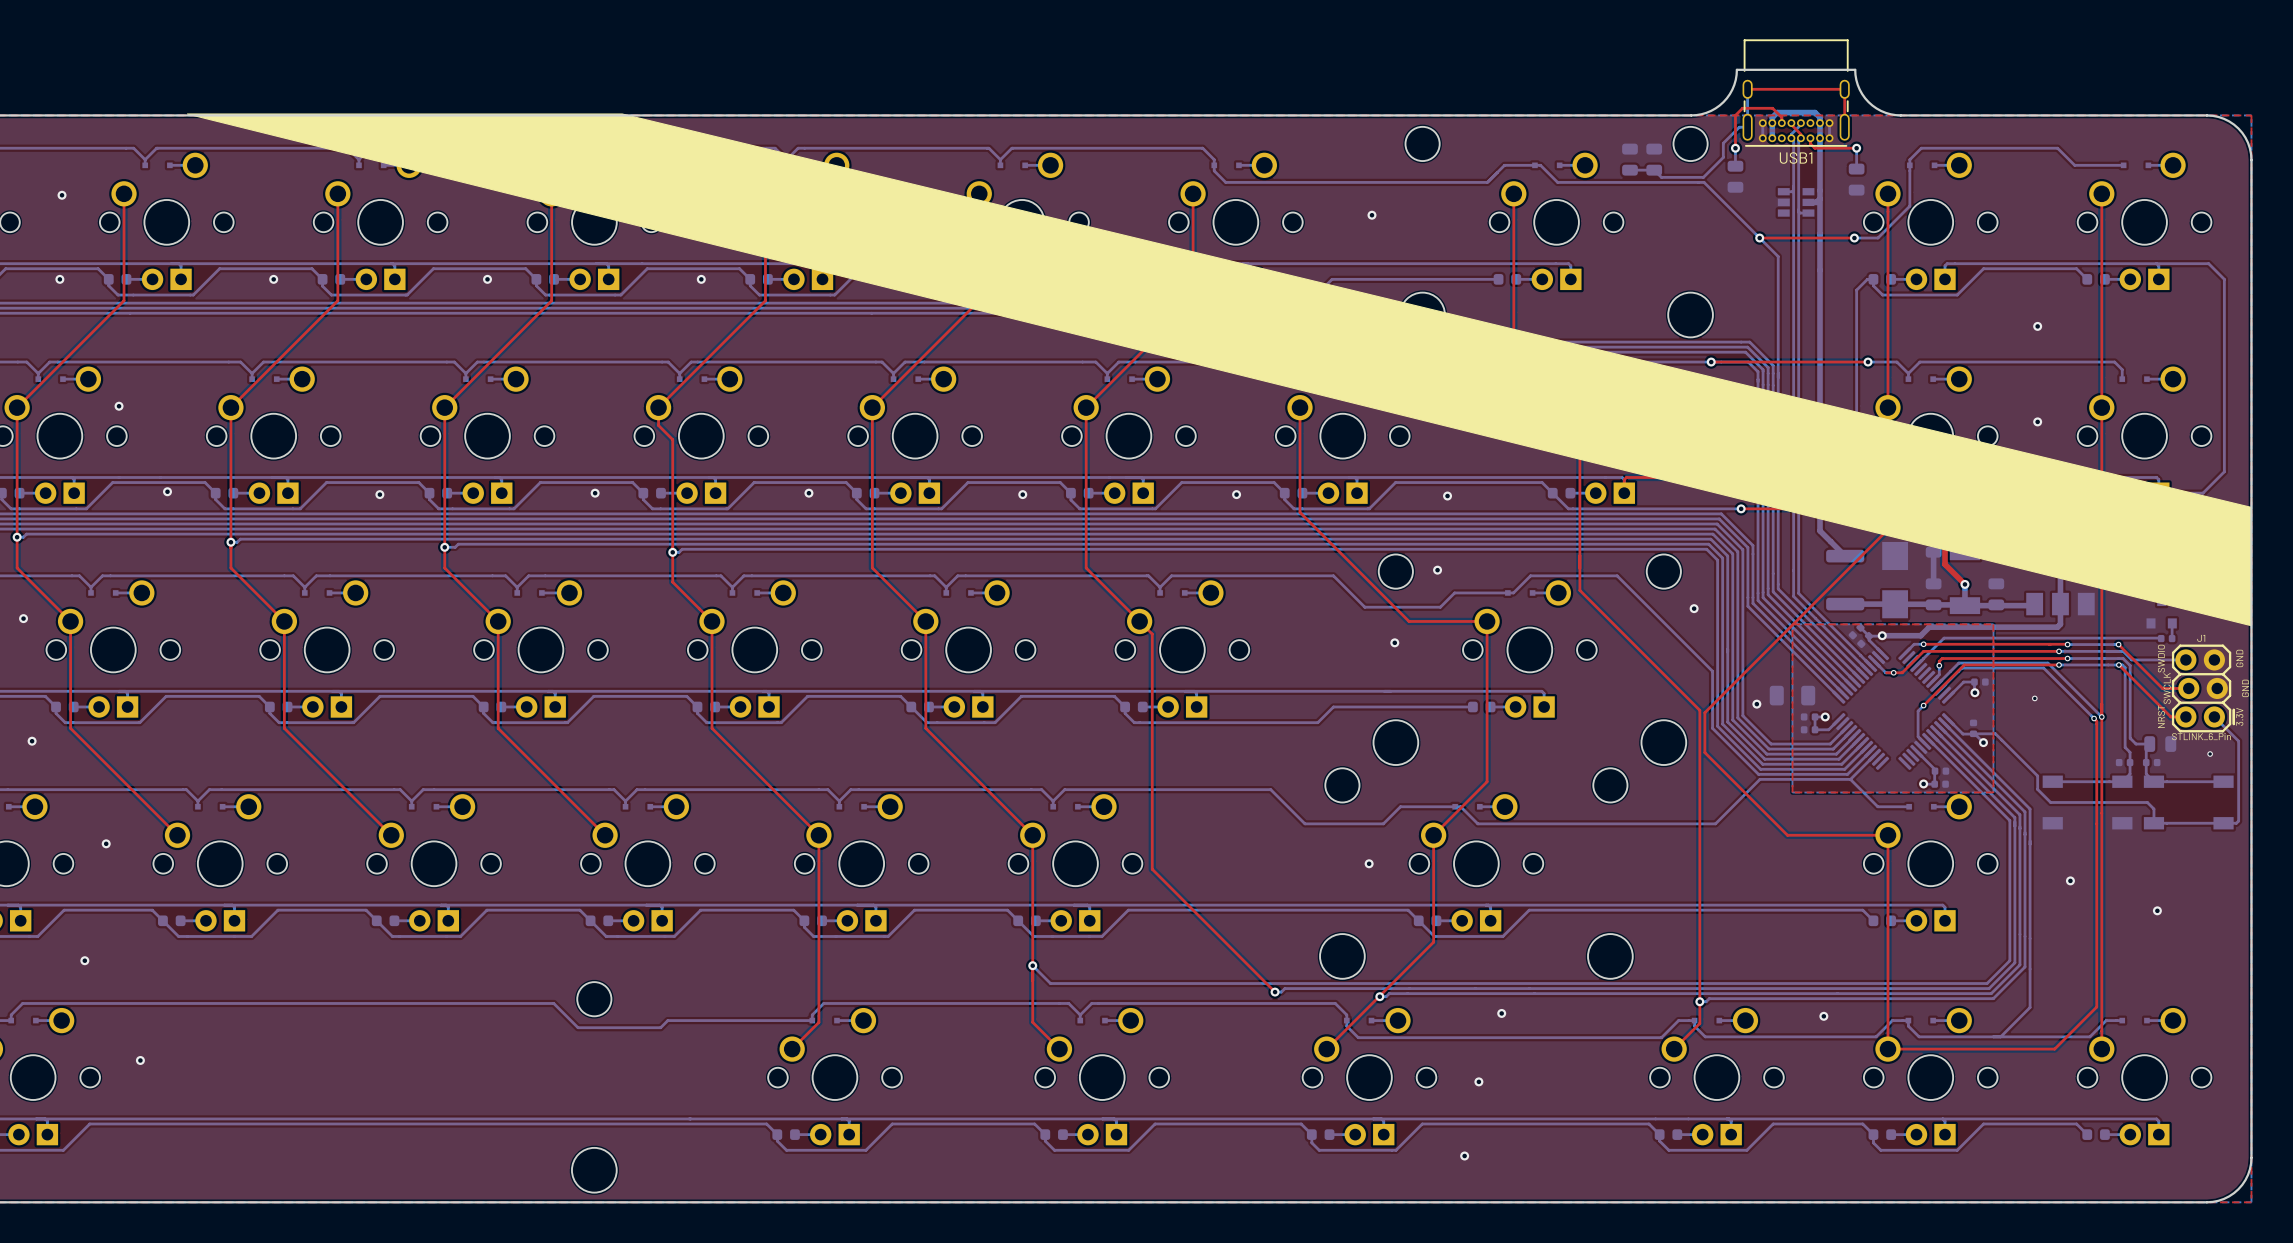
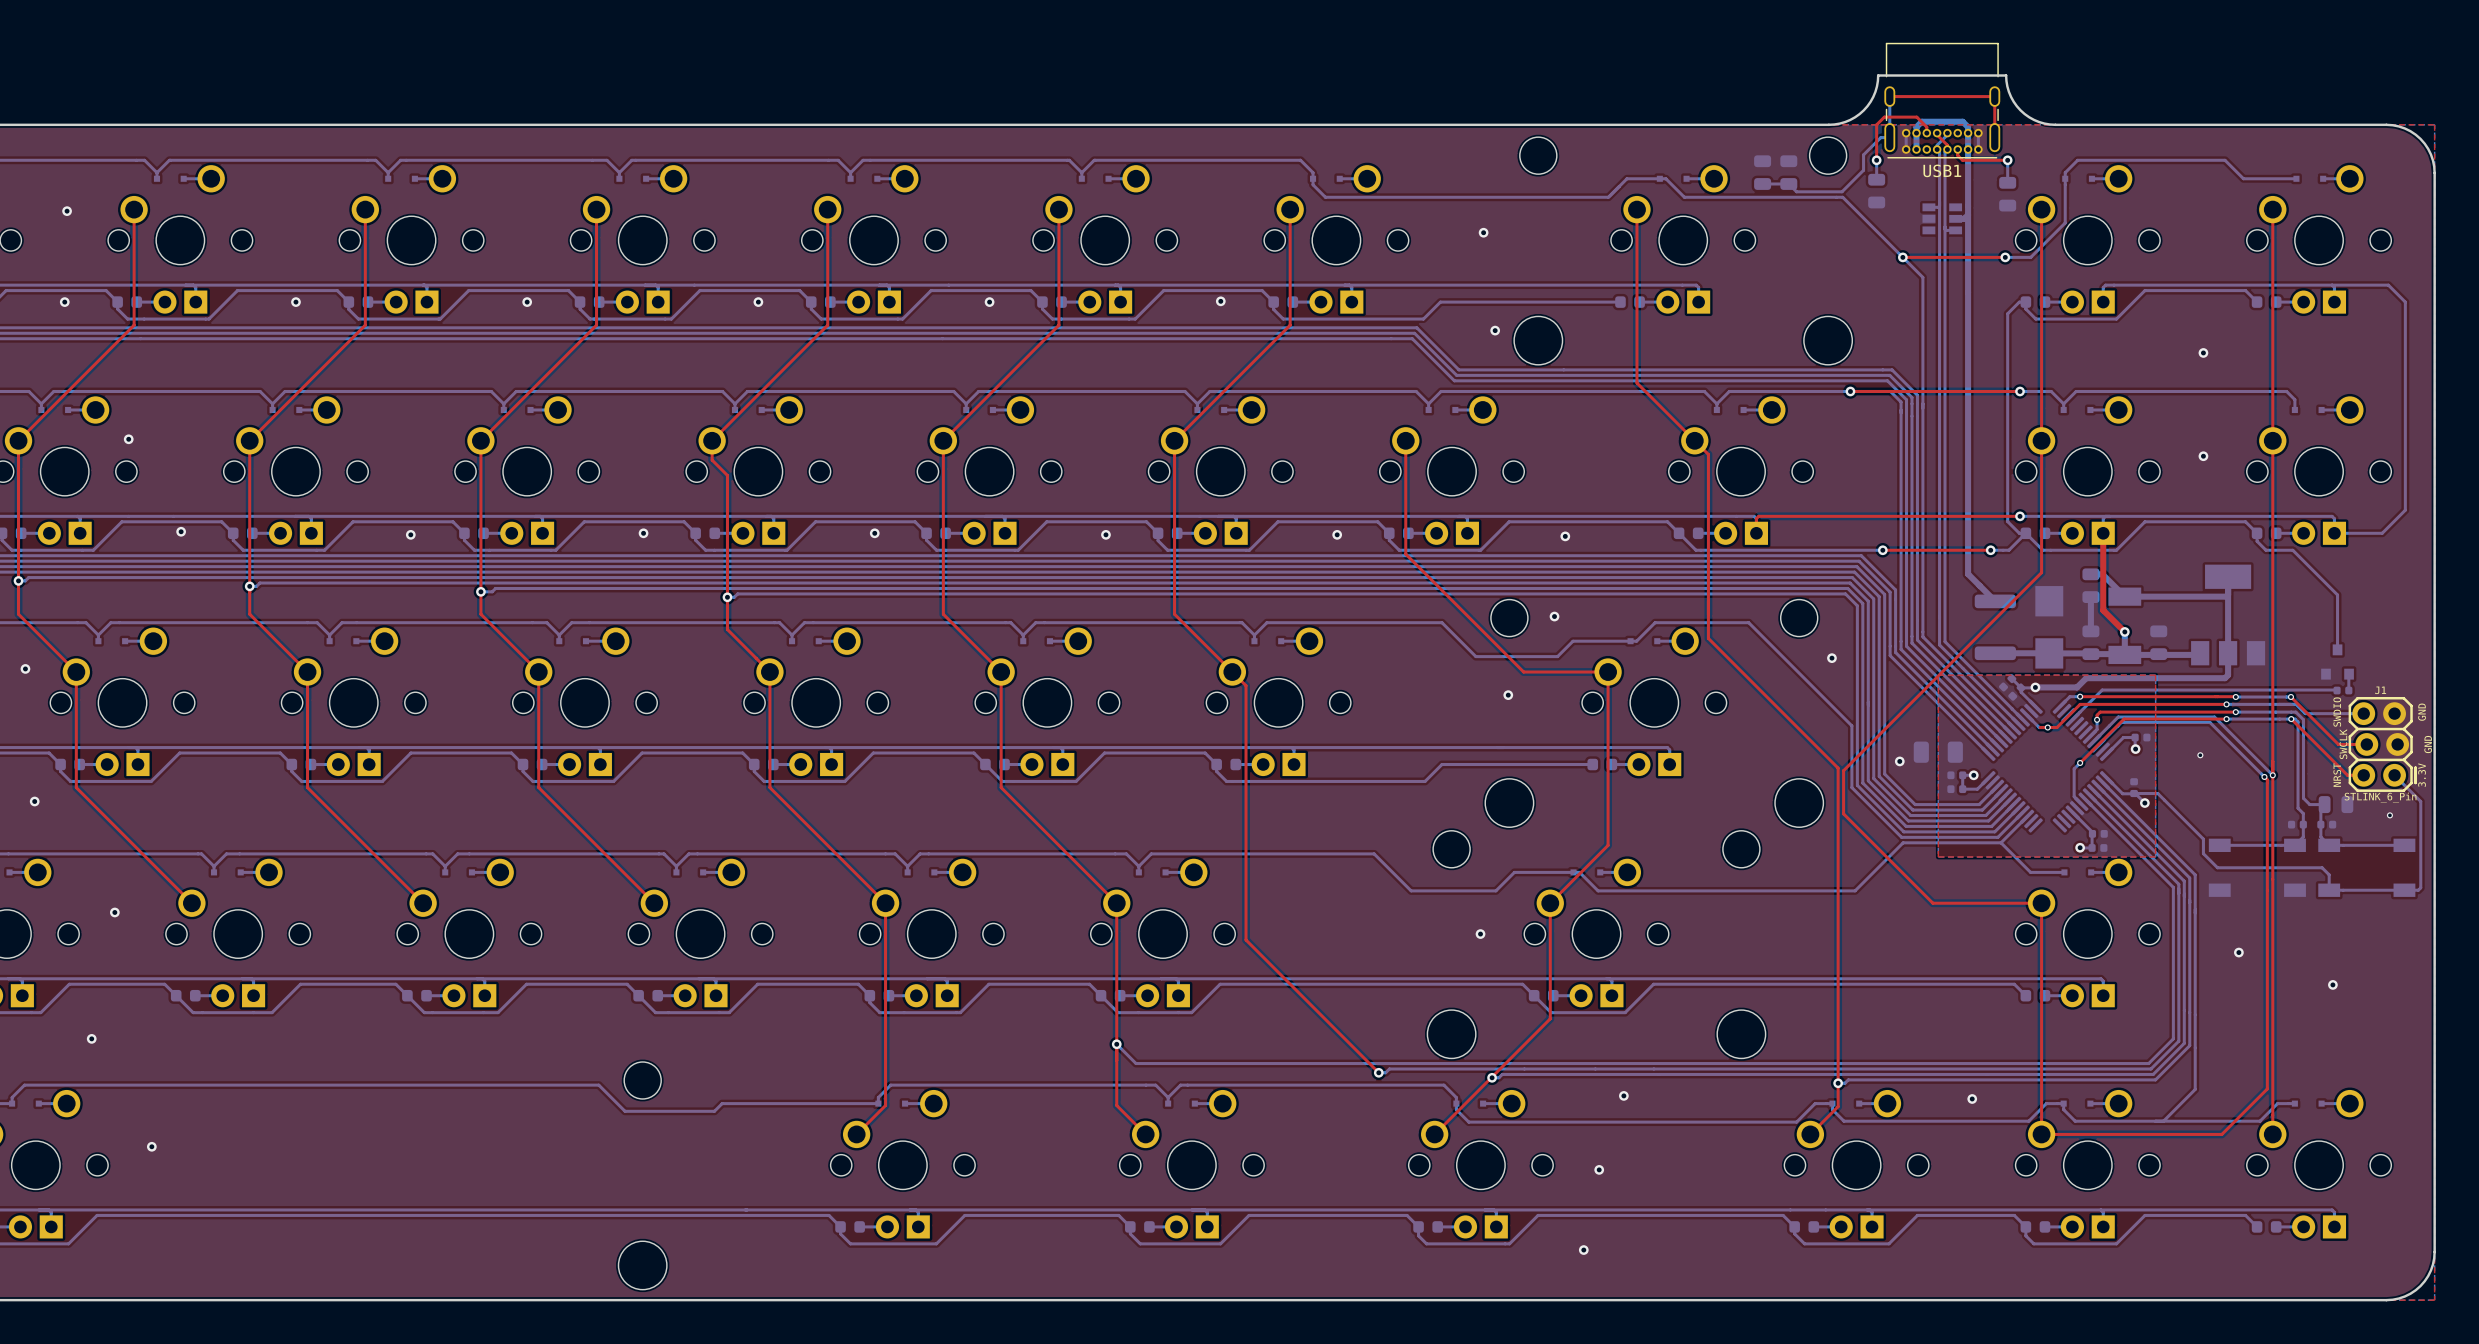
drawing: [186, 113, 2253, 627] -> none

